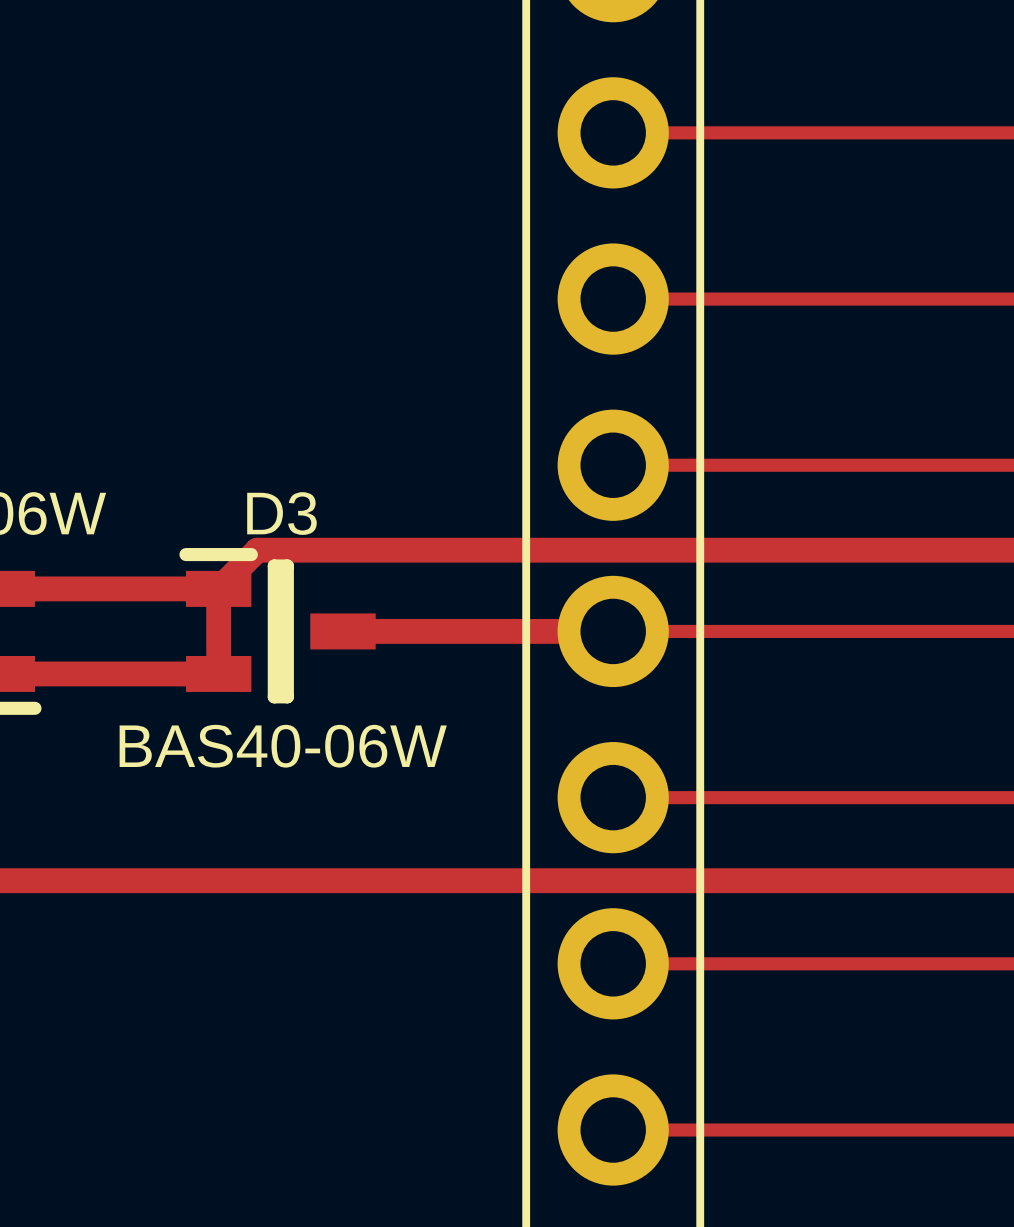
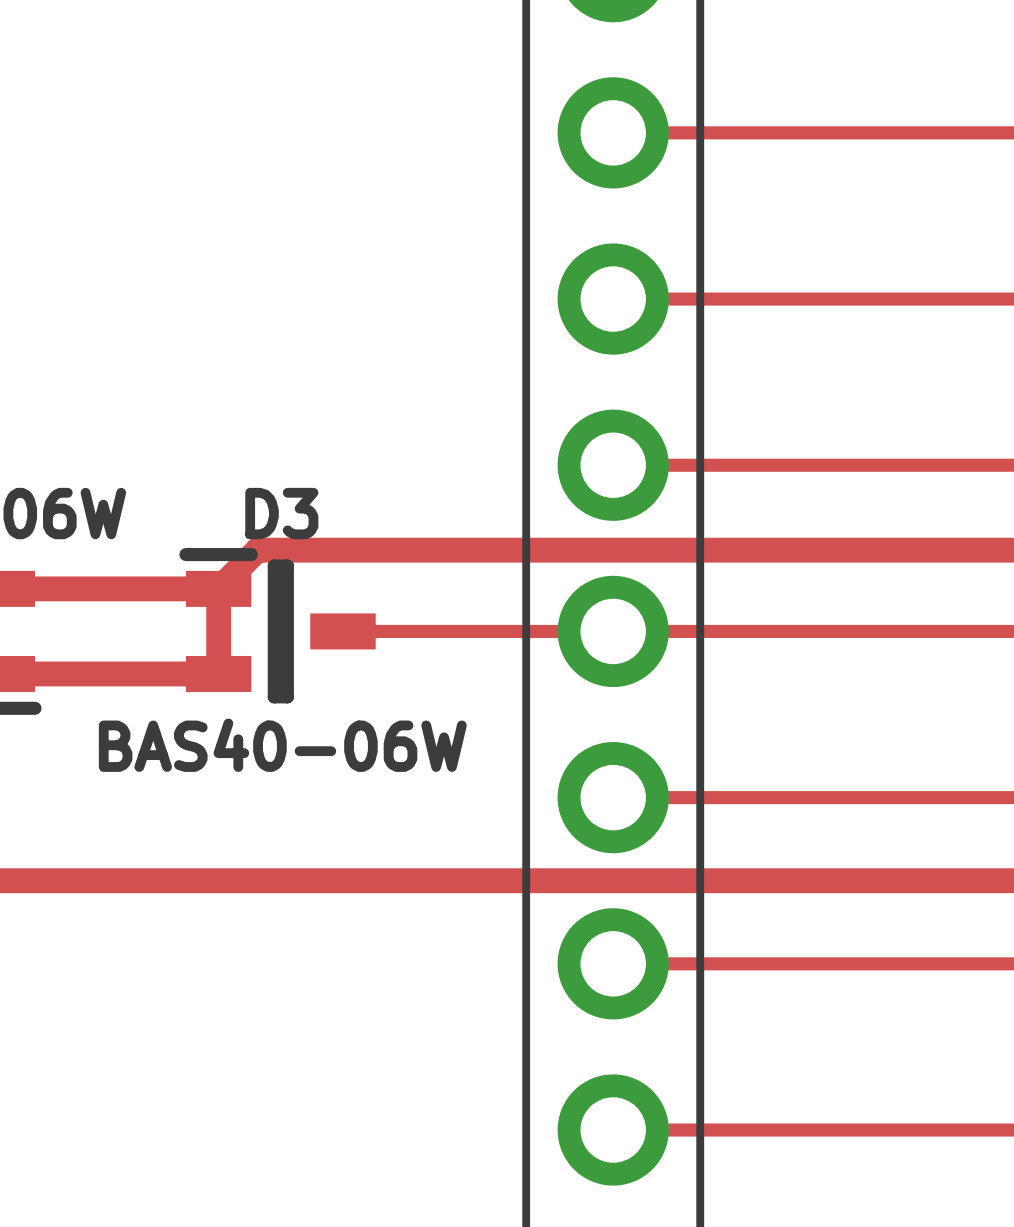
track width: thick (342, 631) (613, 631) -> thin (342, 631) (613, 631)

